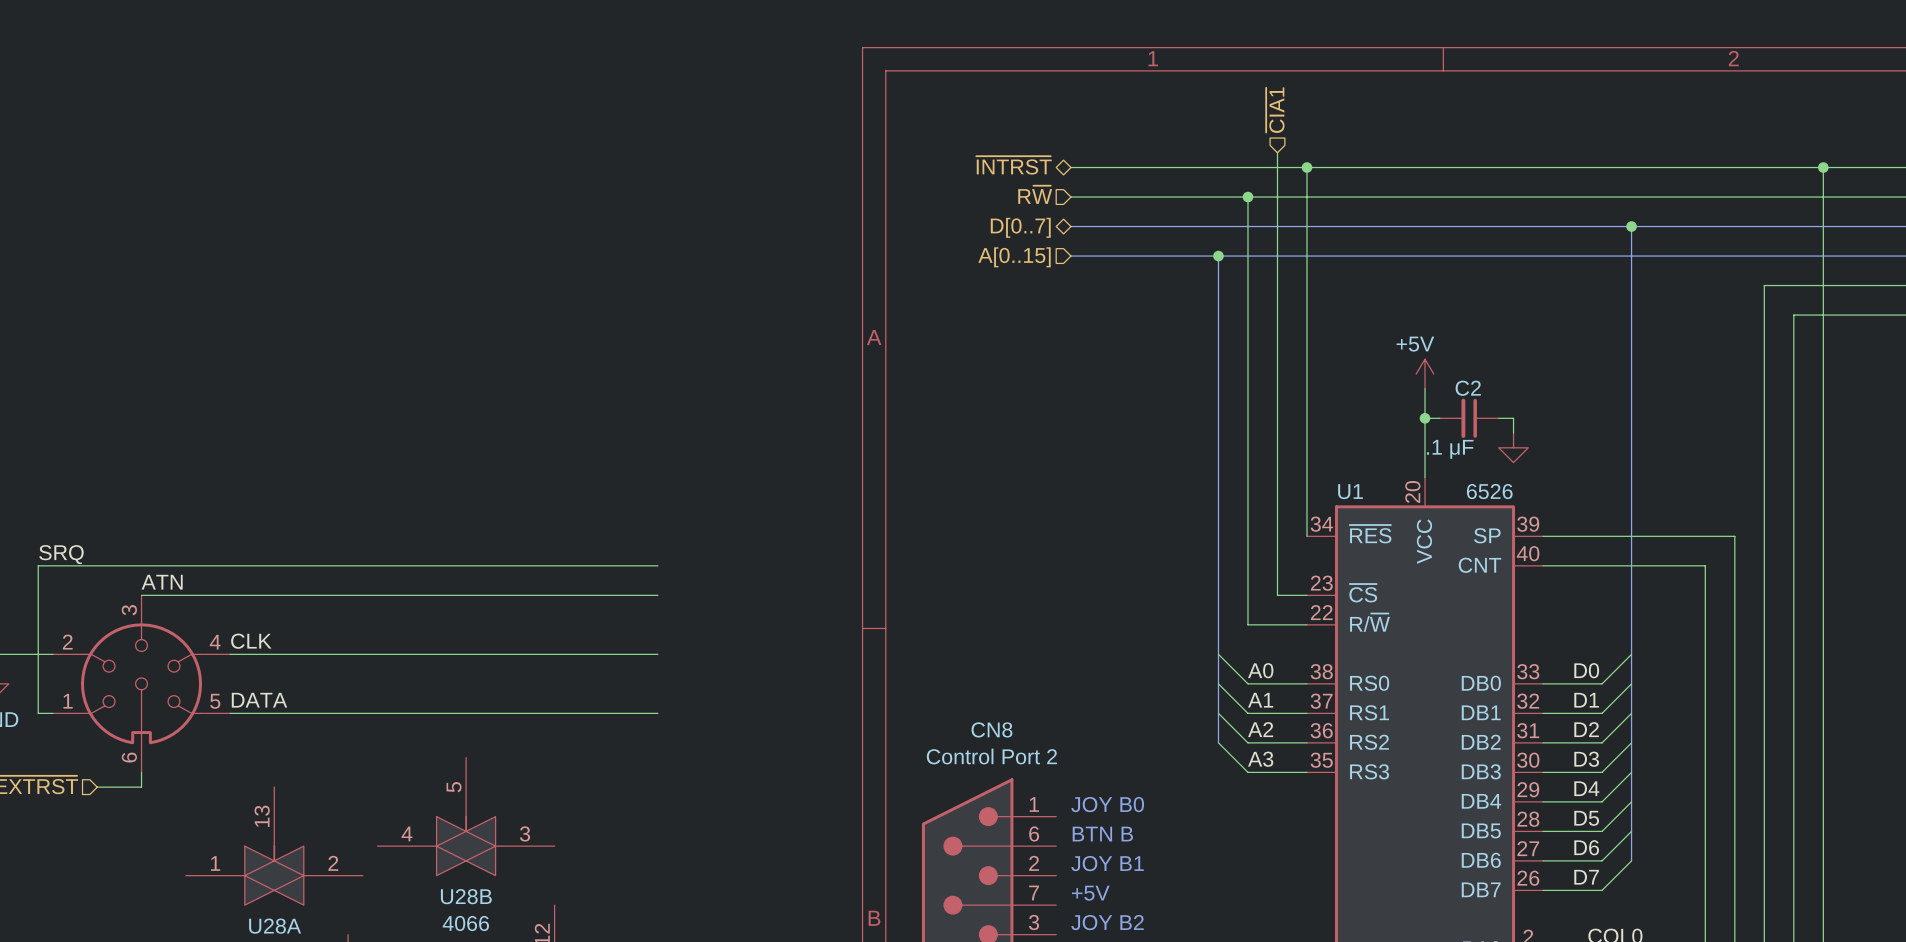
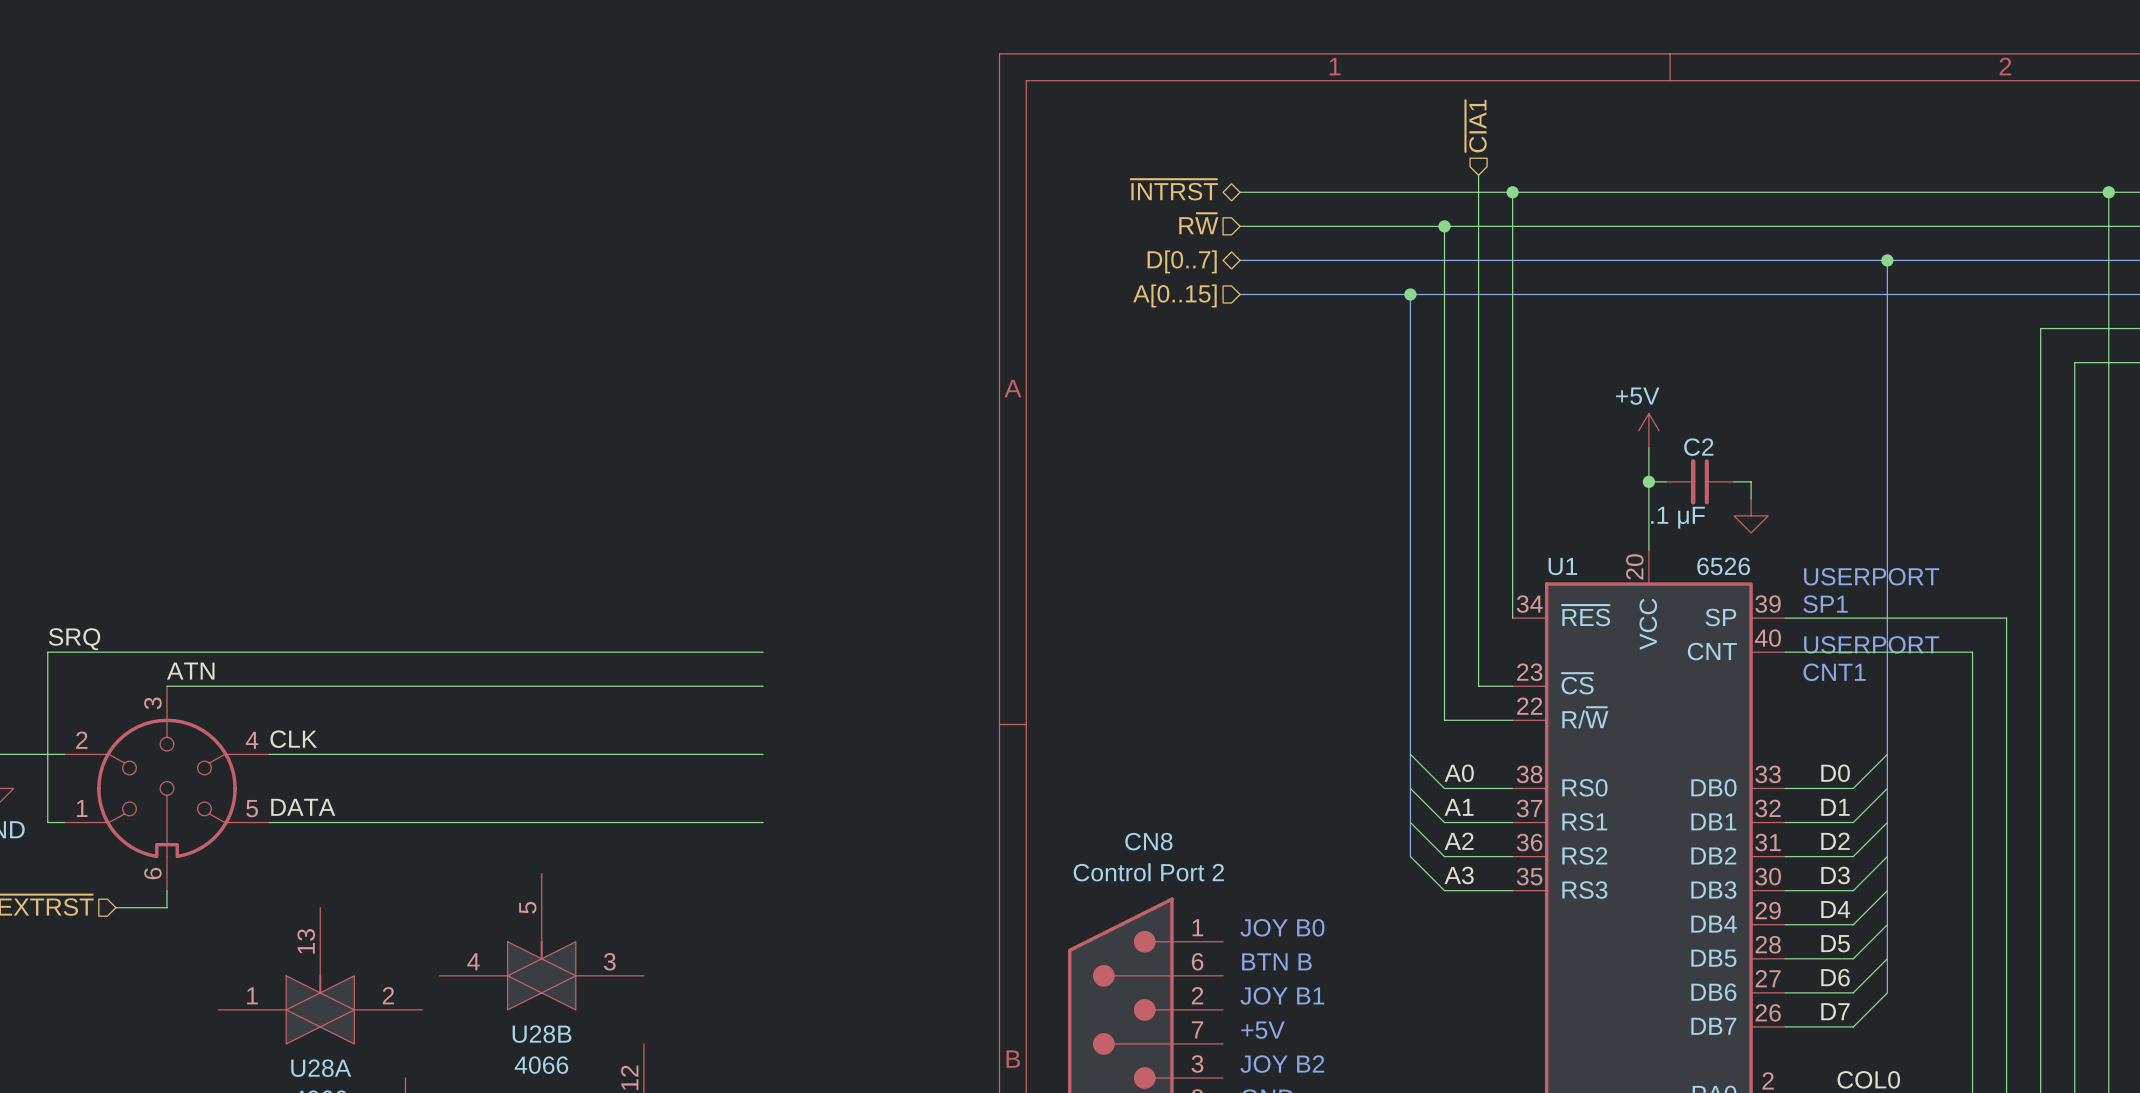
text: none -> USERPORT (1871, 576)
text: none -> SP1 (1825, 604)
text: none -> USERPORT (1871, 644)
text: none -> CNT1 (1834, 672)

